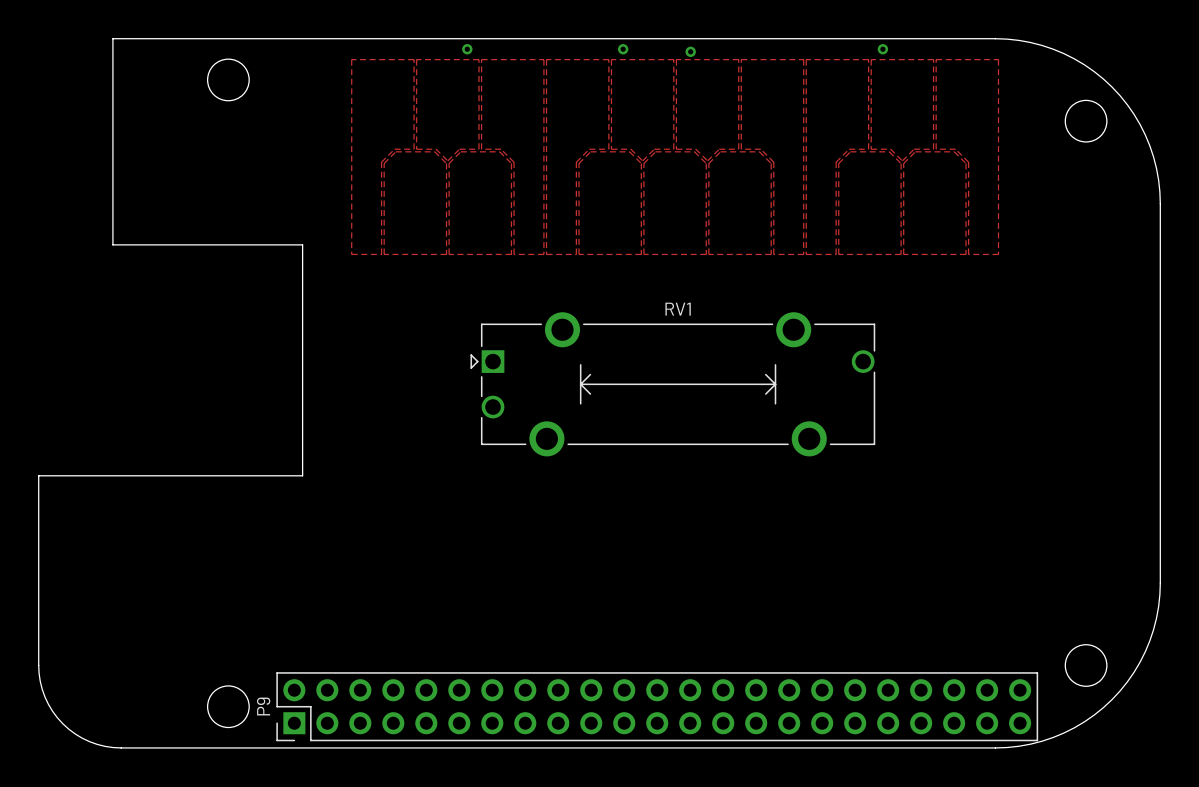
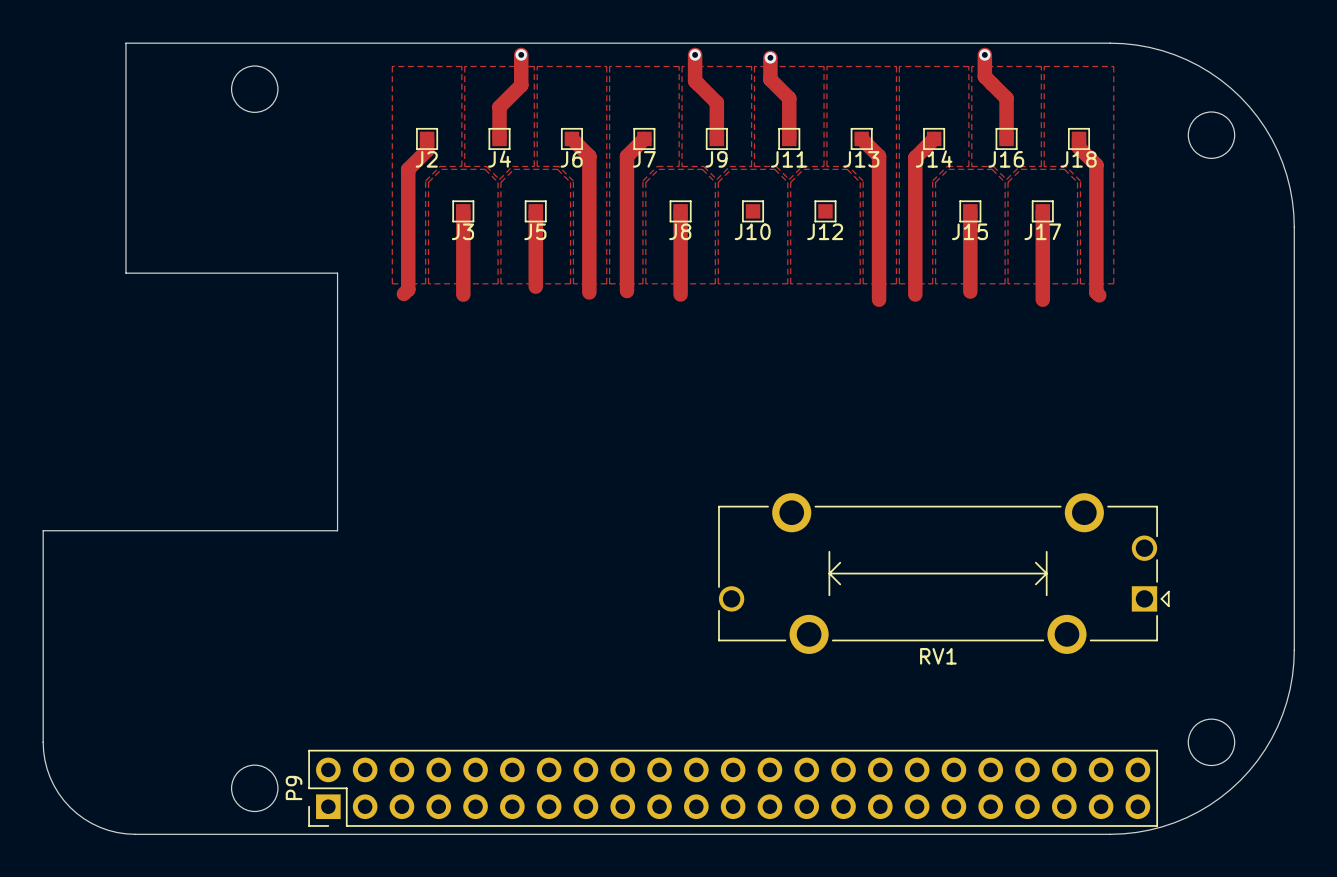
top track: none -> (521, 54) (521, 85) (499, 107) (499, 138)
top track: none -> (695, 54) (695, 80) (716, 102) (716, 138)
top track: none -> (984, 54) (984, 76) (1006, 98) (1006, 138)
top track: none -> (770, 57) (770, 79) (789, 98) (789, 138)
top track: none -> (427, 138) (427, 150) (408, 169) (408, 289) (403, 293)
J2: none -> (427, 138)
J4: none -> (499, 138)
top track: none -> (571, 138) (589, 156) (589, 292)
J6: none -> (571, 138)
top track: none -> (644, 138) (627, 156) (627, 291)
J7: none -> (644, 138)
J9: none -> (716, 138)
J11: none -> (789, 138)
top track: none -> (861, 138) (879, 156) (879, 299)
J13: none -> (861, 138)
top track: none -> (934, 138) (915, 157) (915, 294)
J14: none -> (934, 138)
J16: none -> (1006, 138)
top track: none -> (1079, 138) (1079, 147) (1096, 165) (1096, 292) (1099, 295)
J18: none -> (1079, 138)
top track: none -> (463, 211) (463, 294)
J3: none -> (463, 211)
top track: none -> (535, 211) (535, 286)
J5: none -> (535, 211)
top track: none -> (680, 211) (680, 294)
J8: none -> (680, 211)
J10: none -> (753, 211)
J12: none -> (825, 211)
top track: none -> (970, 211) (970, 291)
J15: none -> (970, 211)
top track: none -> (1042, 211) (1042, 299)
J17: none -> (1042, 211)
RV1 rotation: 0° (672, 384) -> 180° (943, 573)

